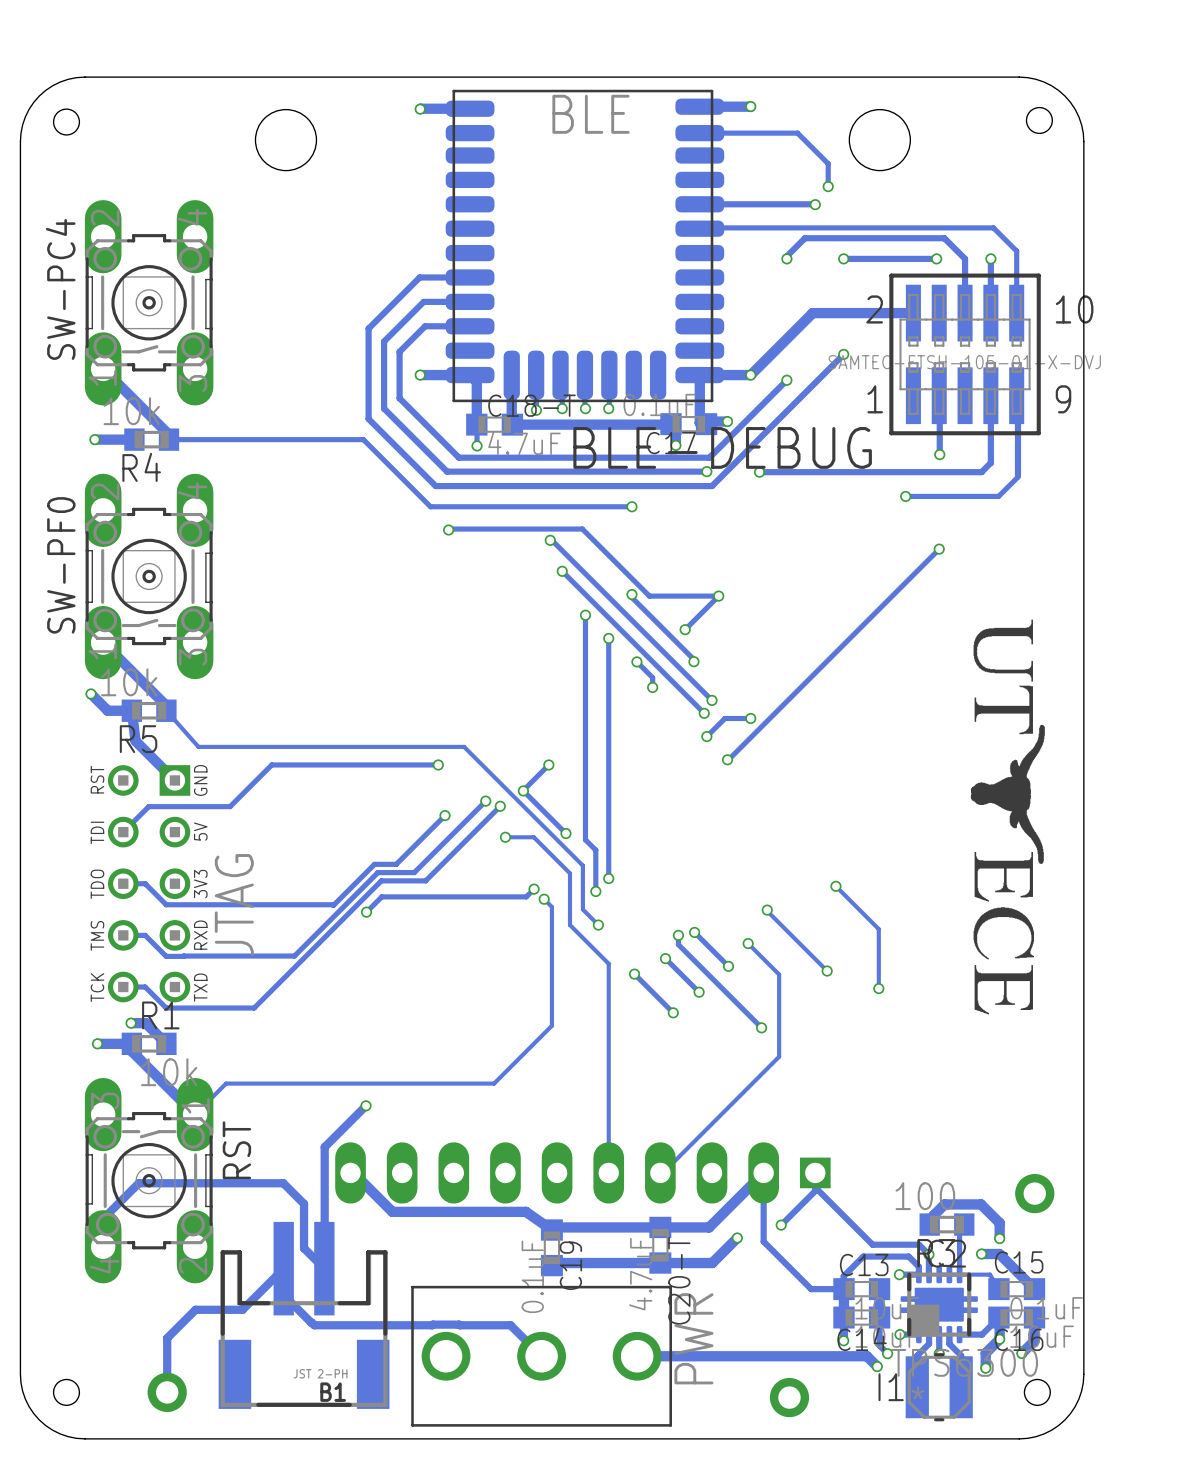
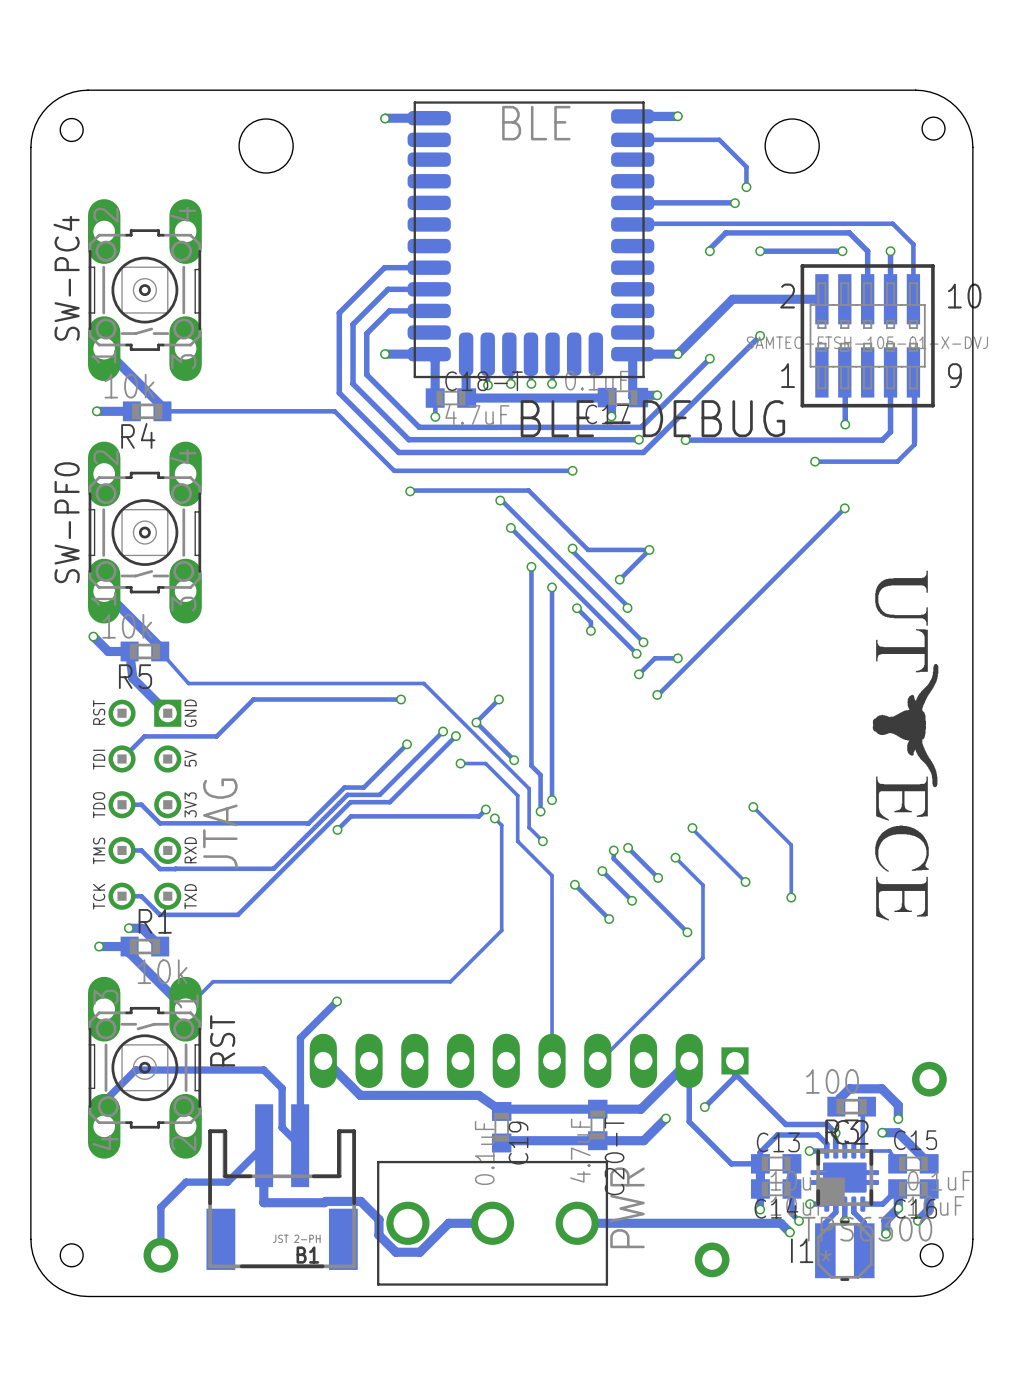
track: (283, 1268) (283, 1295) (314, 1325) (510, 1325) (541, 1356) -> (264, 1145) (263, 1202) (360, 1201) (378, 1219) (378, 1235) (395, 1252) (419, 1252) (448, 1223) (492, 1223)

